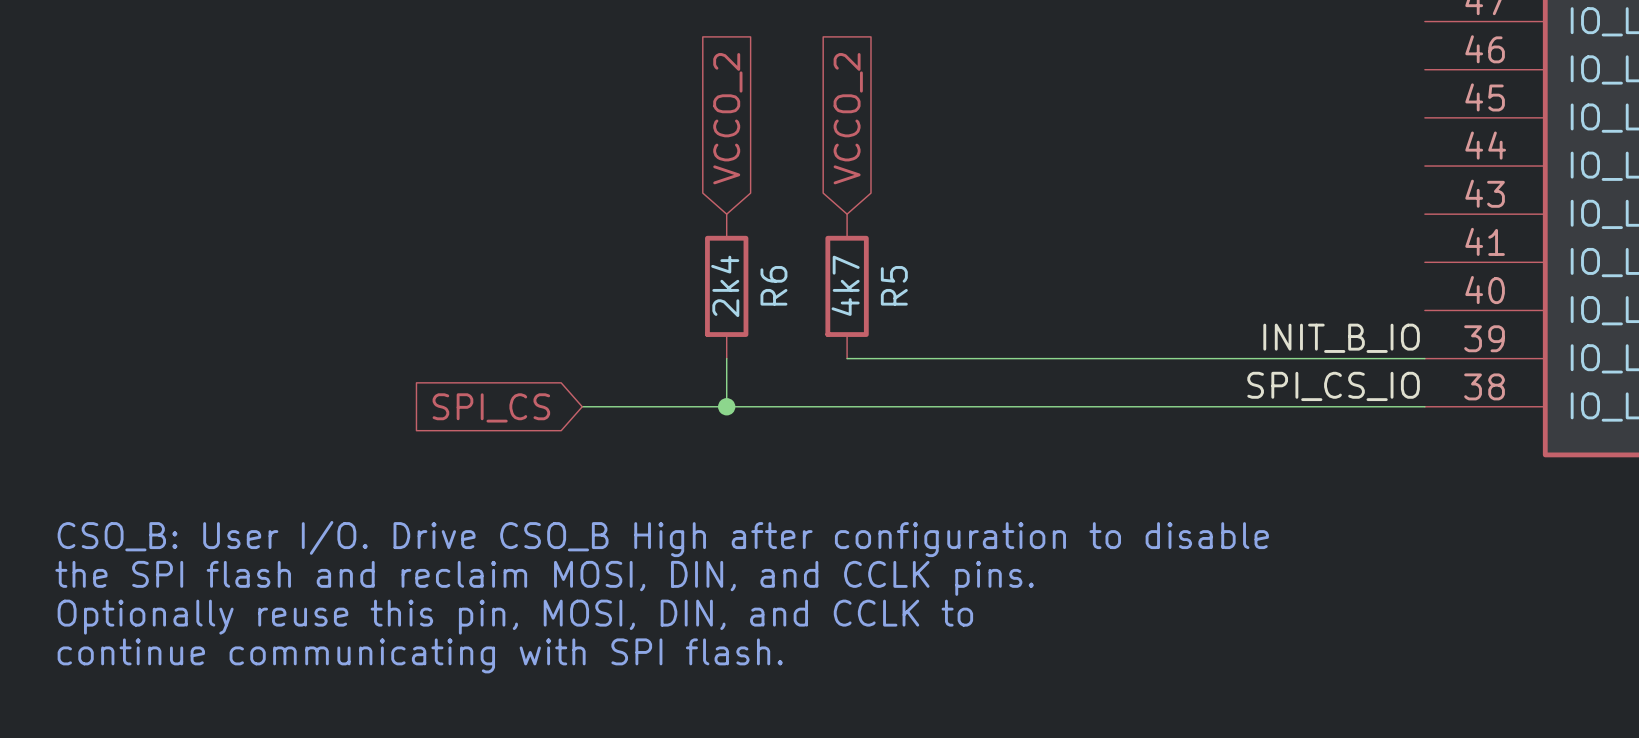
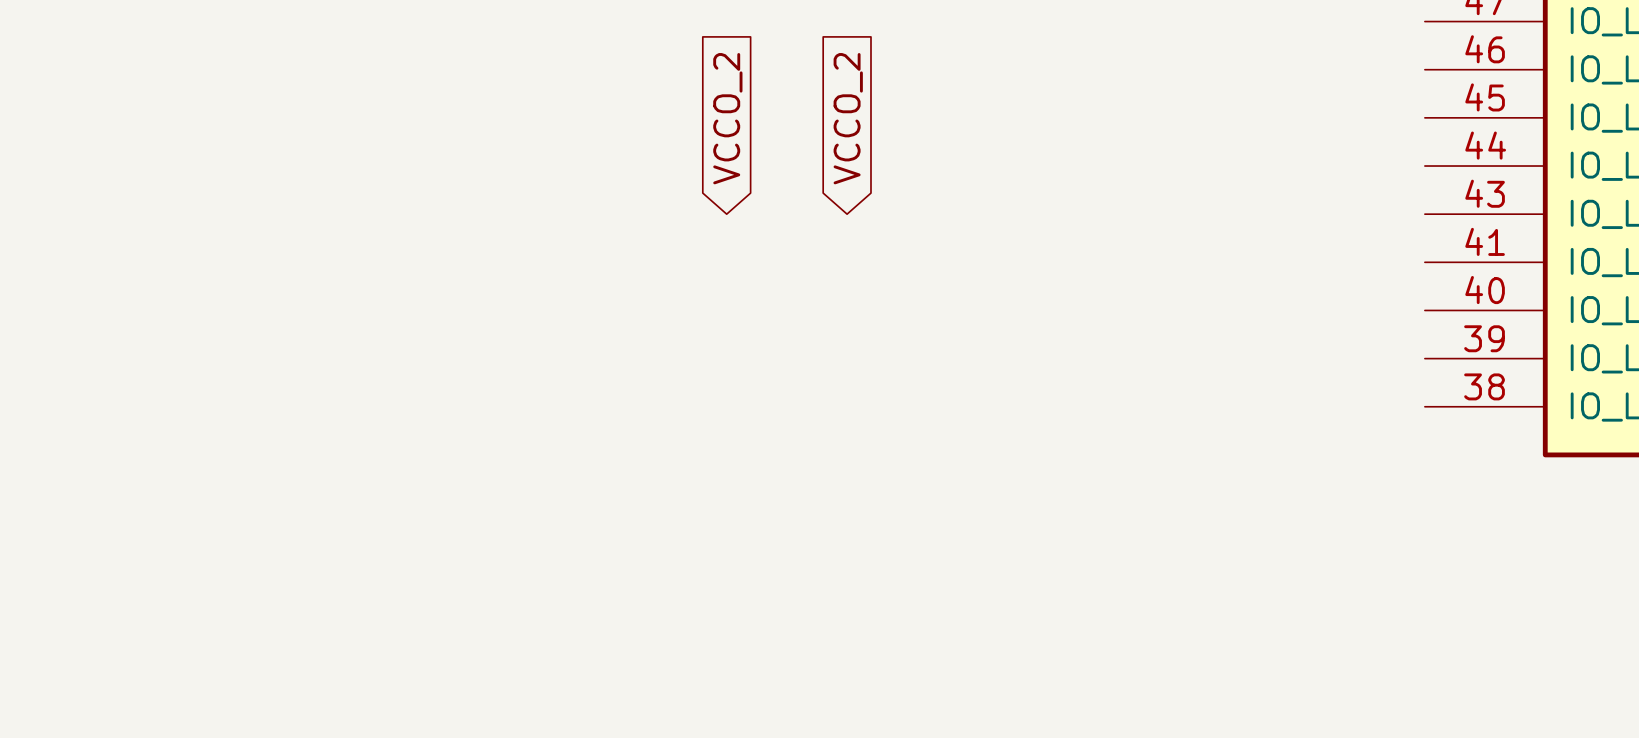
R6: 2k4 (726, 286) -> none
R5: 4k7 (847, 286) -> none
label: INIT_B_IO (1341, 338) -> none
wire: (726, 358) (726, 406) -> none
wire: (847, 358) (1424, 358) -> none
label: SPI_CS_IO (1333, 386) -> none
wire: (582, 406) (1424, 406) -> none
junction: (726, 406) -> none
global label: SPI_CS (491, 407) -> none
text: CSO_B: User I/O. Drive CSO_B High after configuration to disable (663, 539) -> none
text: the SPI flash and reclaim MOSI, DIN, and CCLK pins. (544, 578) -> none
text: Optionally reuse this pin, MOSI, DIN, and CCLK to (515, 617) -> none
text: continue communicating with SPI flash. (420, 655) -> none

